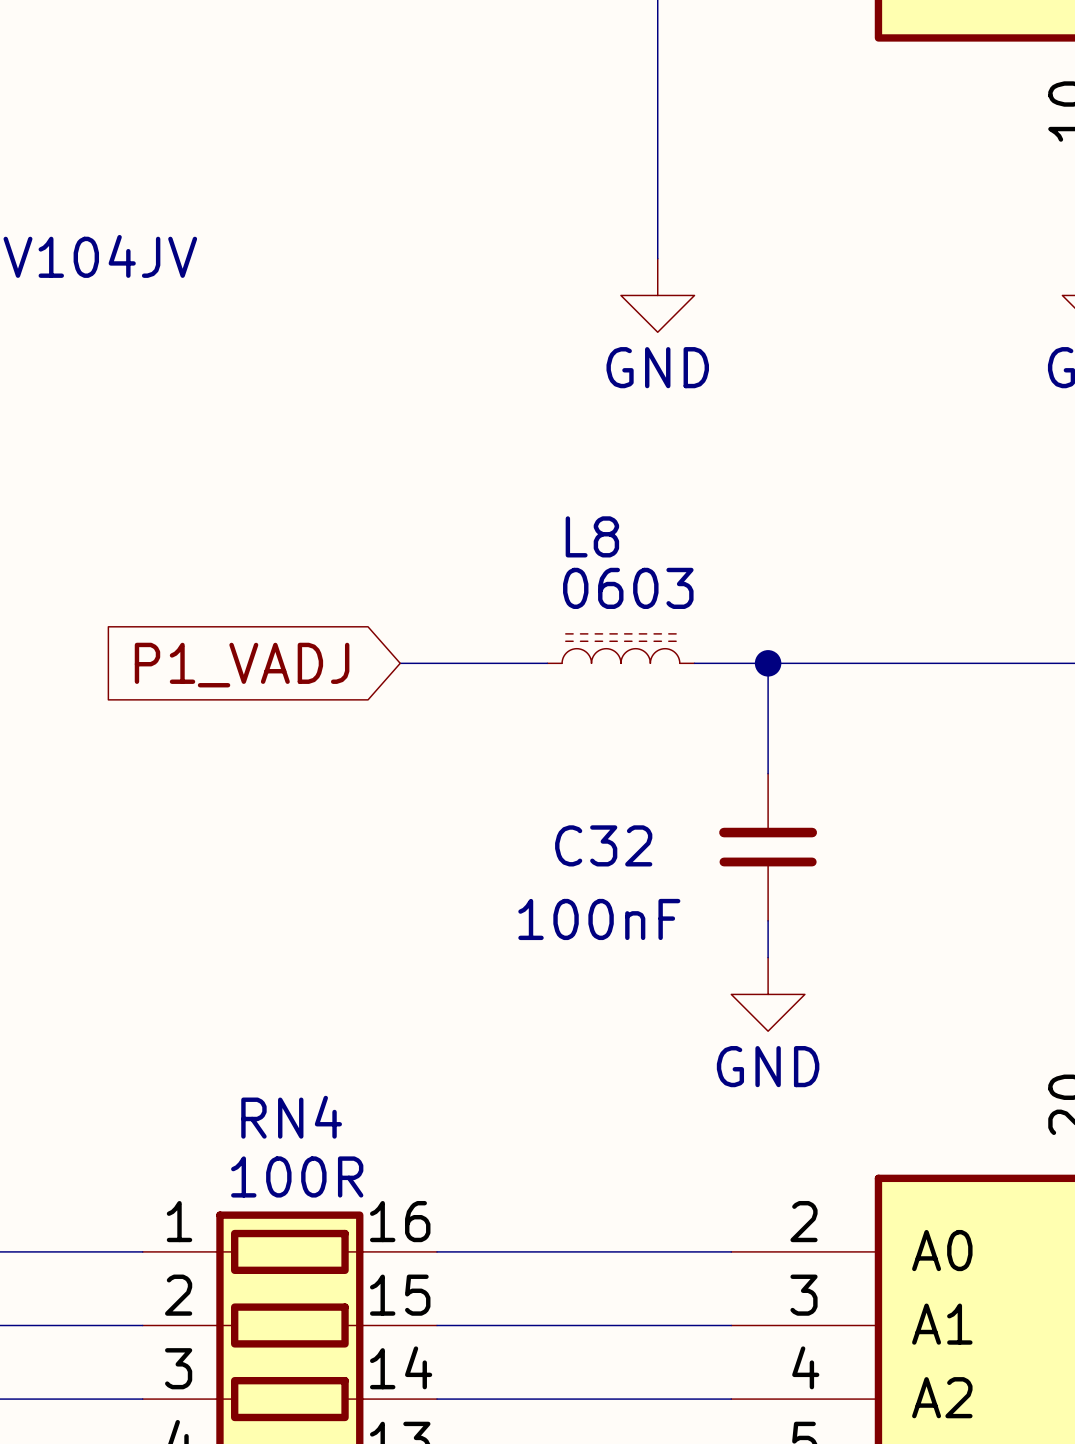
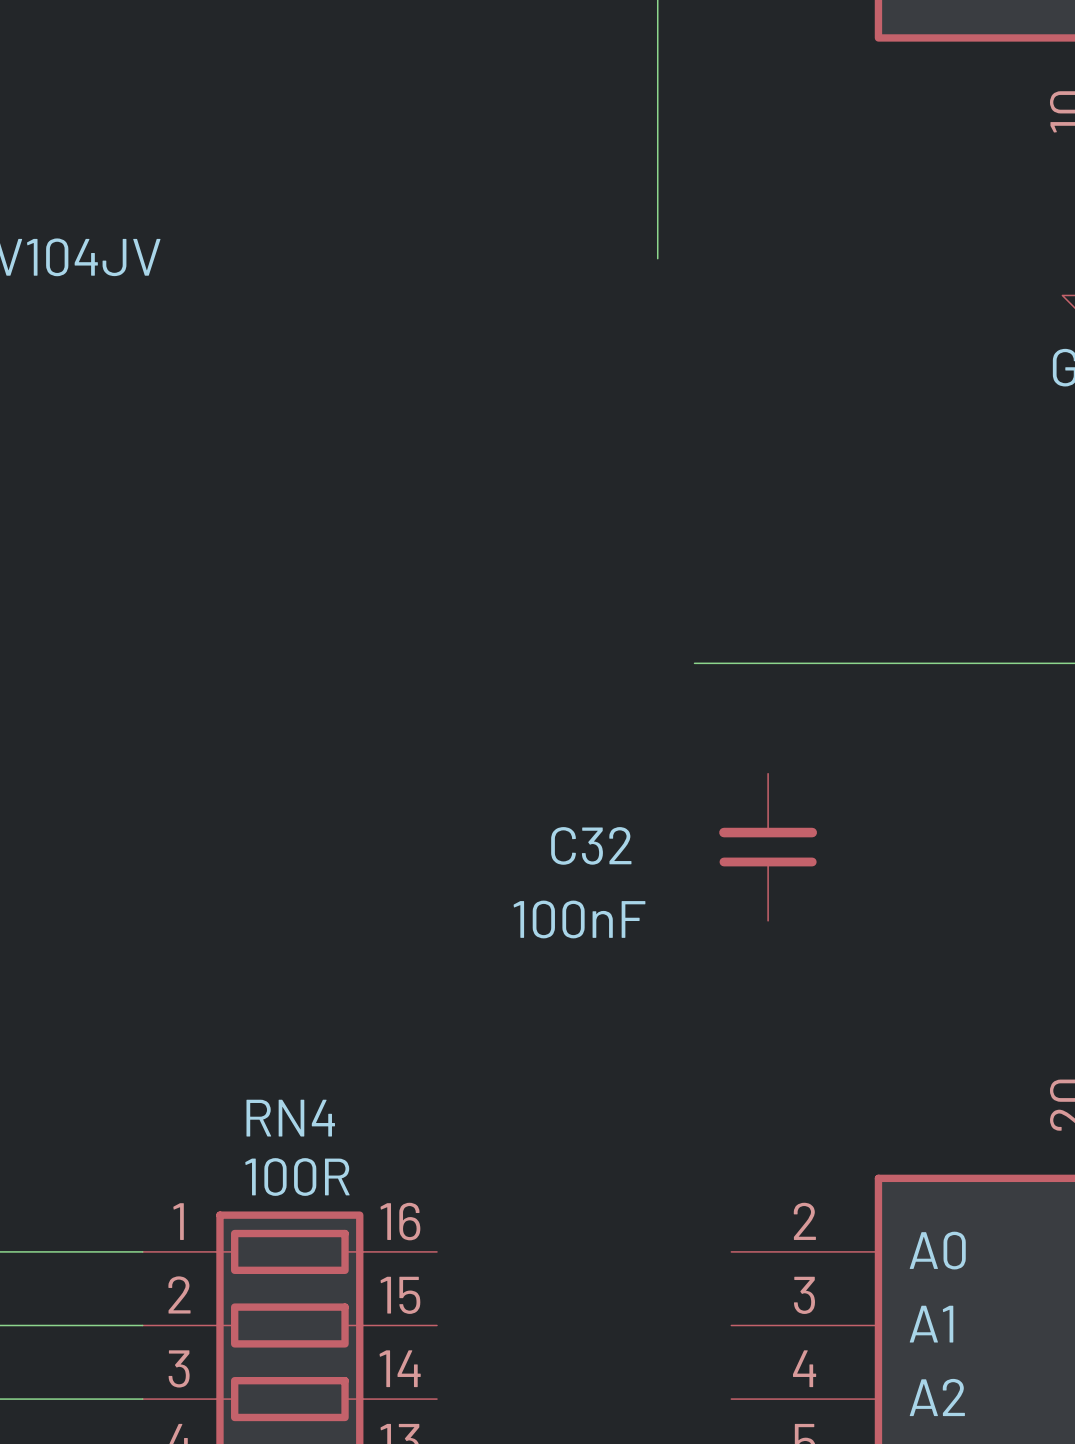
power symbol: GND (657, 295) -> none
L8: 0603 (620, 648) -> none
wire: (400, 663) (547, 663) -> none
wire: (768, 663) (768, 773) -> none
junction: (768, 663) -> none
global label: P1_VADJ (242, 665) -> none
wire: (768, 920) (768, 957) -> none
power symbol: GND (768, 994) -> none
wire: (437, 1251) (731, 1251) -> none
wire: (437, 1325) (731, 1325) -> none
wire: (437, 1399) (731, 1399) -> none

